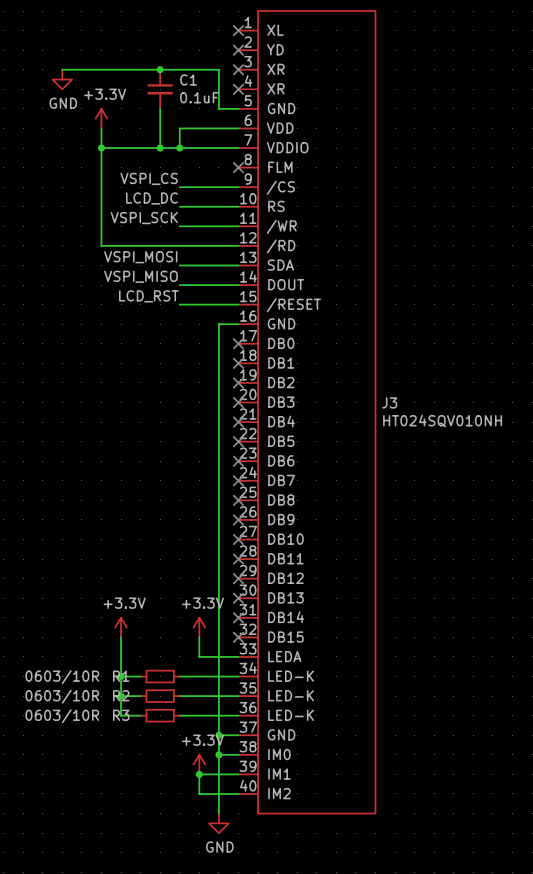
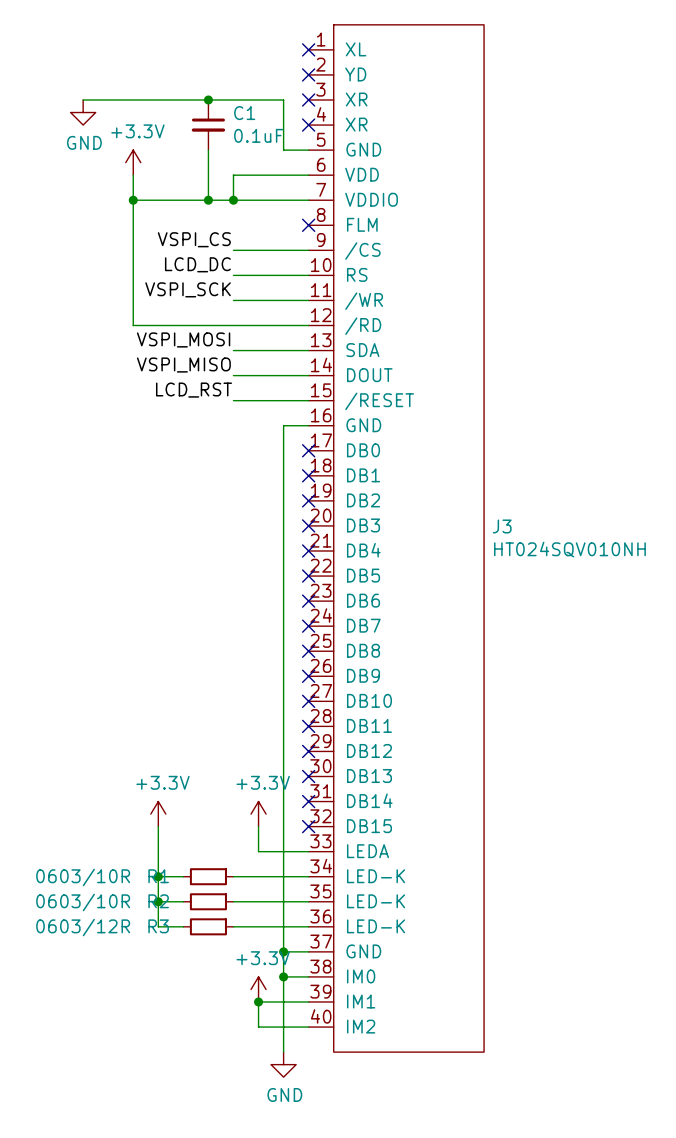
R3 value: 0603/10R (62, 716) -> 0603/12R (83, 927)

